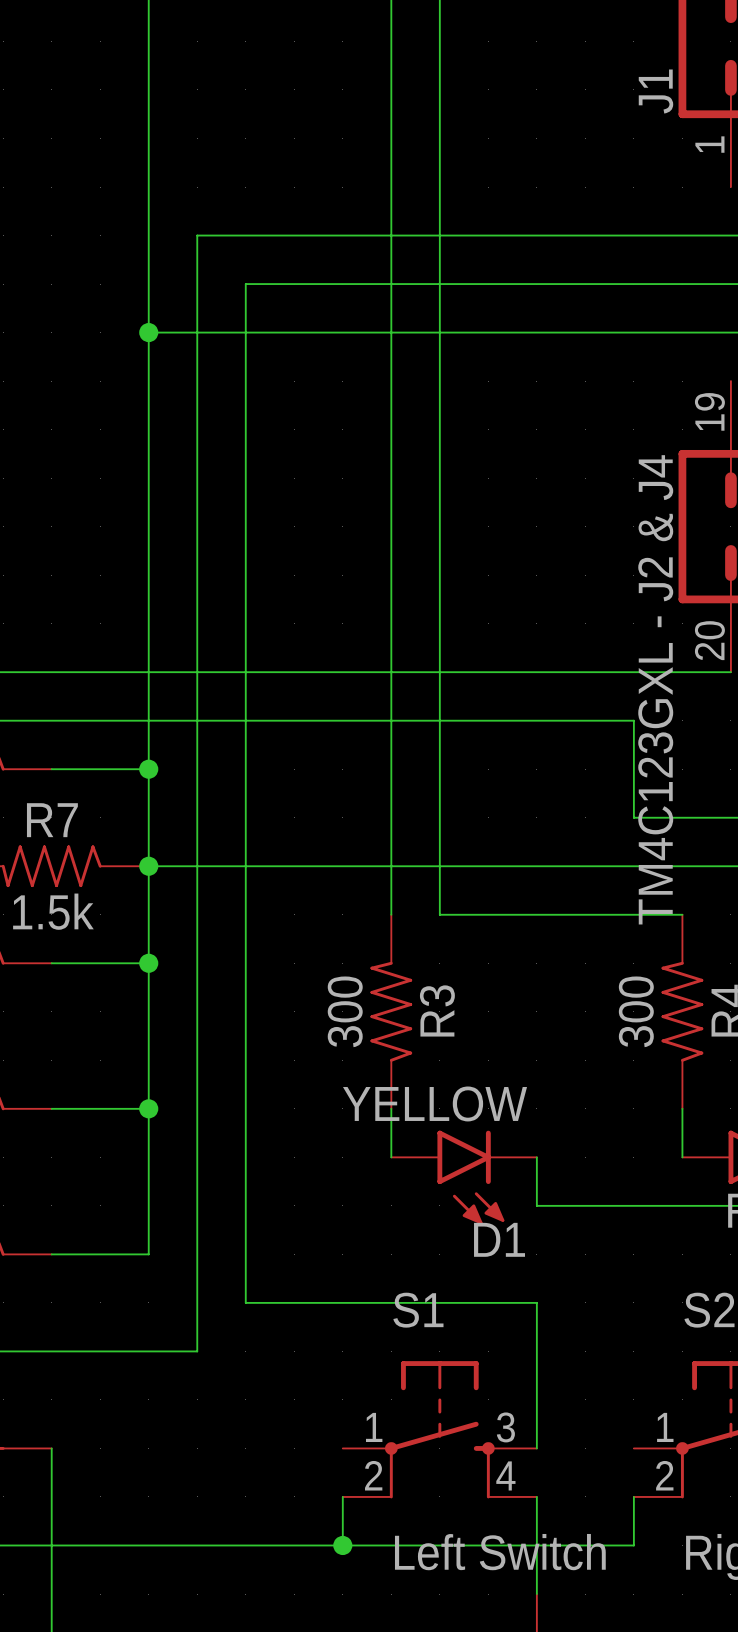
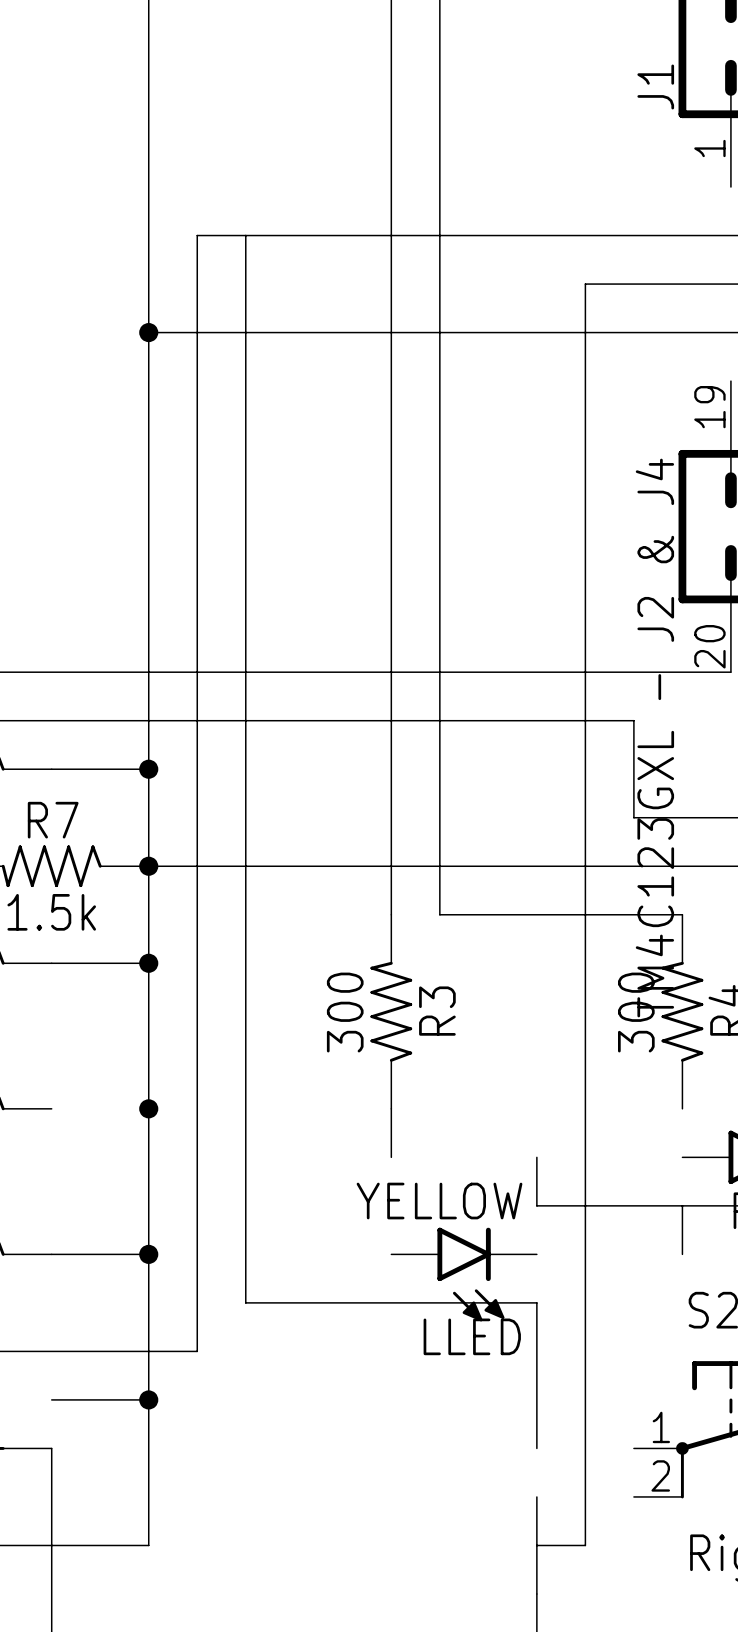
wire: (245, 284) (585, 284) -> (245, 284) (245, 235)
wire: (51, 1108) (148, 1108) -> (51, 1399) (148, 1399)
wire: (682, 1108) (682, 1157) -> (682, 1205) (682, 1254)
D1: YELLOW (464, 1177) -> none
junction: none -> (148, 1254)
LLED: none -> YELLOW (464, 1274)
junction: none -> (148, 1399)
S1: Left Switch (439, 1429) -> none
wire: (342, 1496) (342, 1545) -> none
wire: (633, 1496) (633, 1545) (585, 1545) -> (585, 284) (585, 1545)
wire: (148, 1545) (536, 1545) -> (148, 1545) (148, 1254)
junction: (342, 1545) -> none

